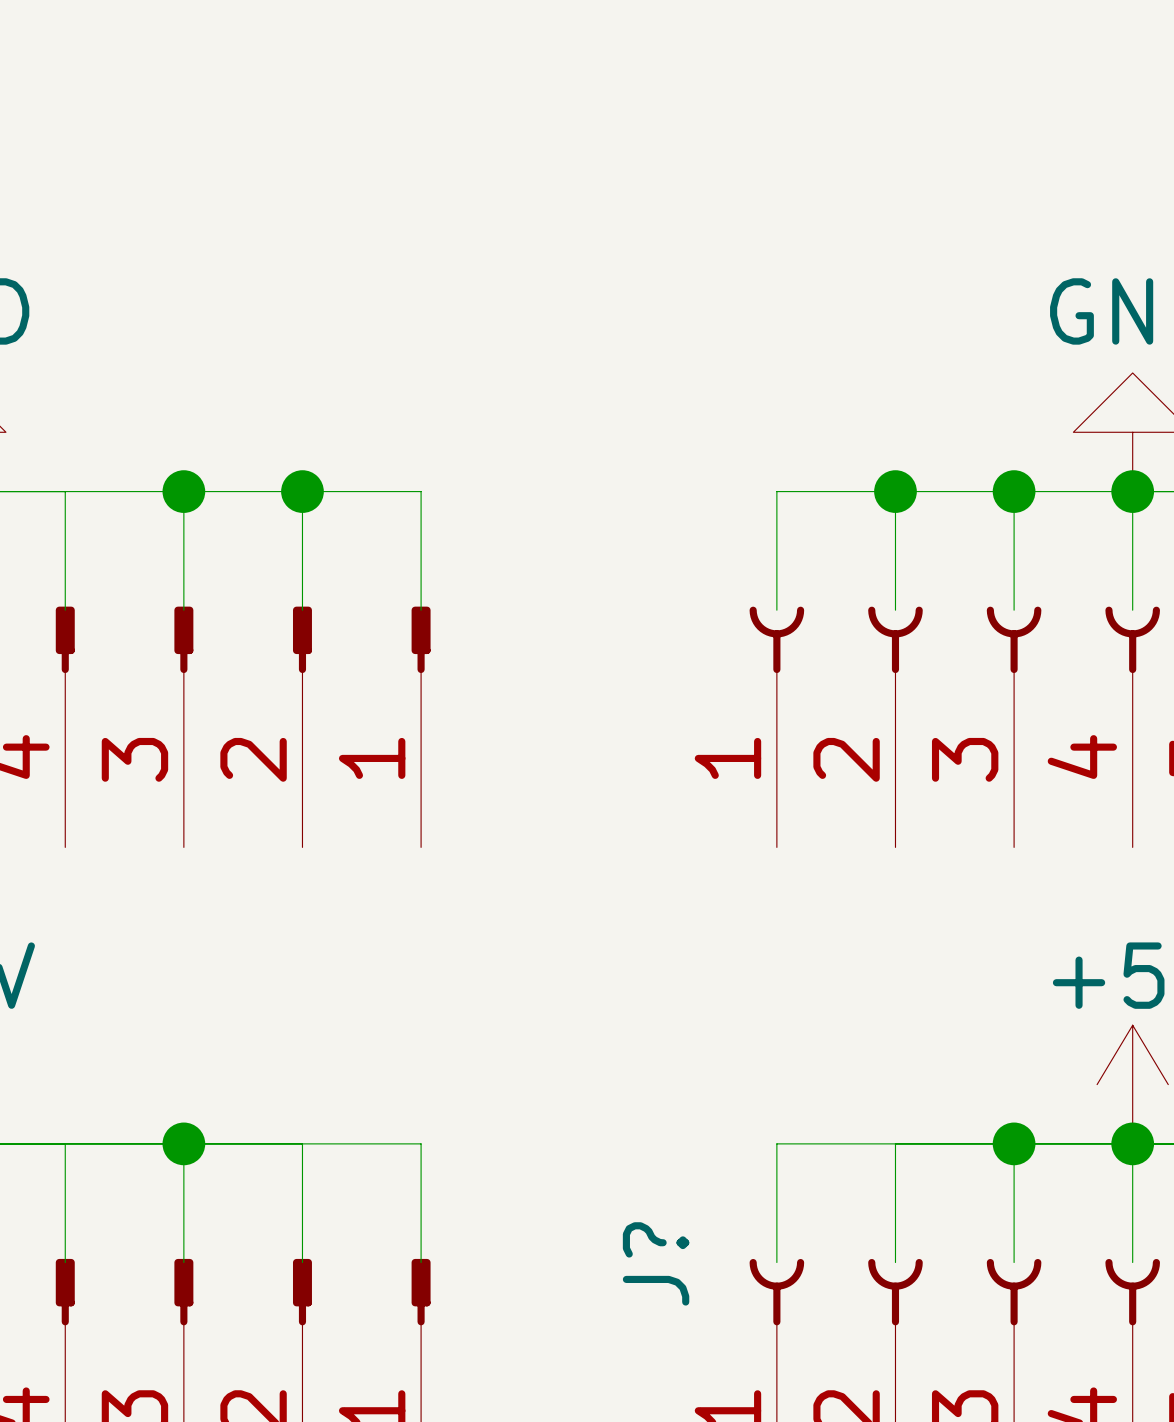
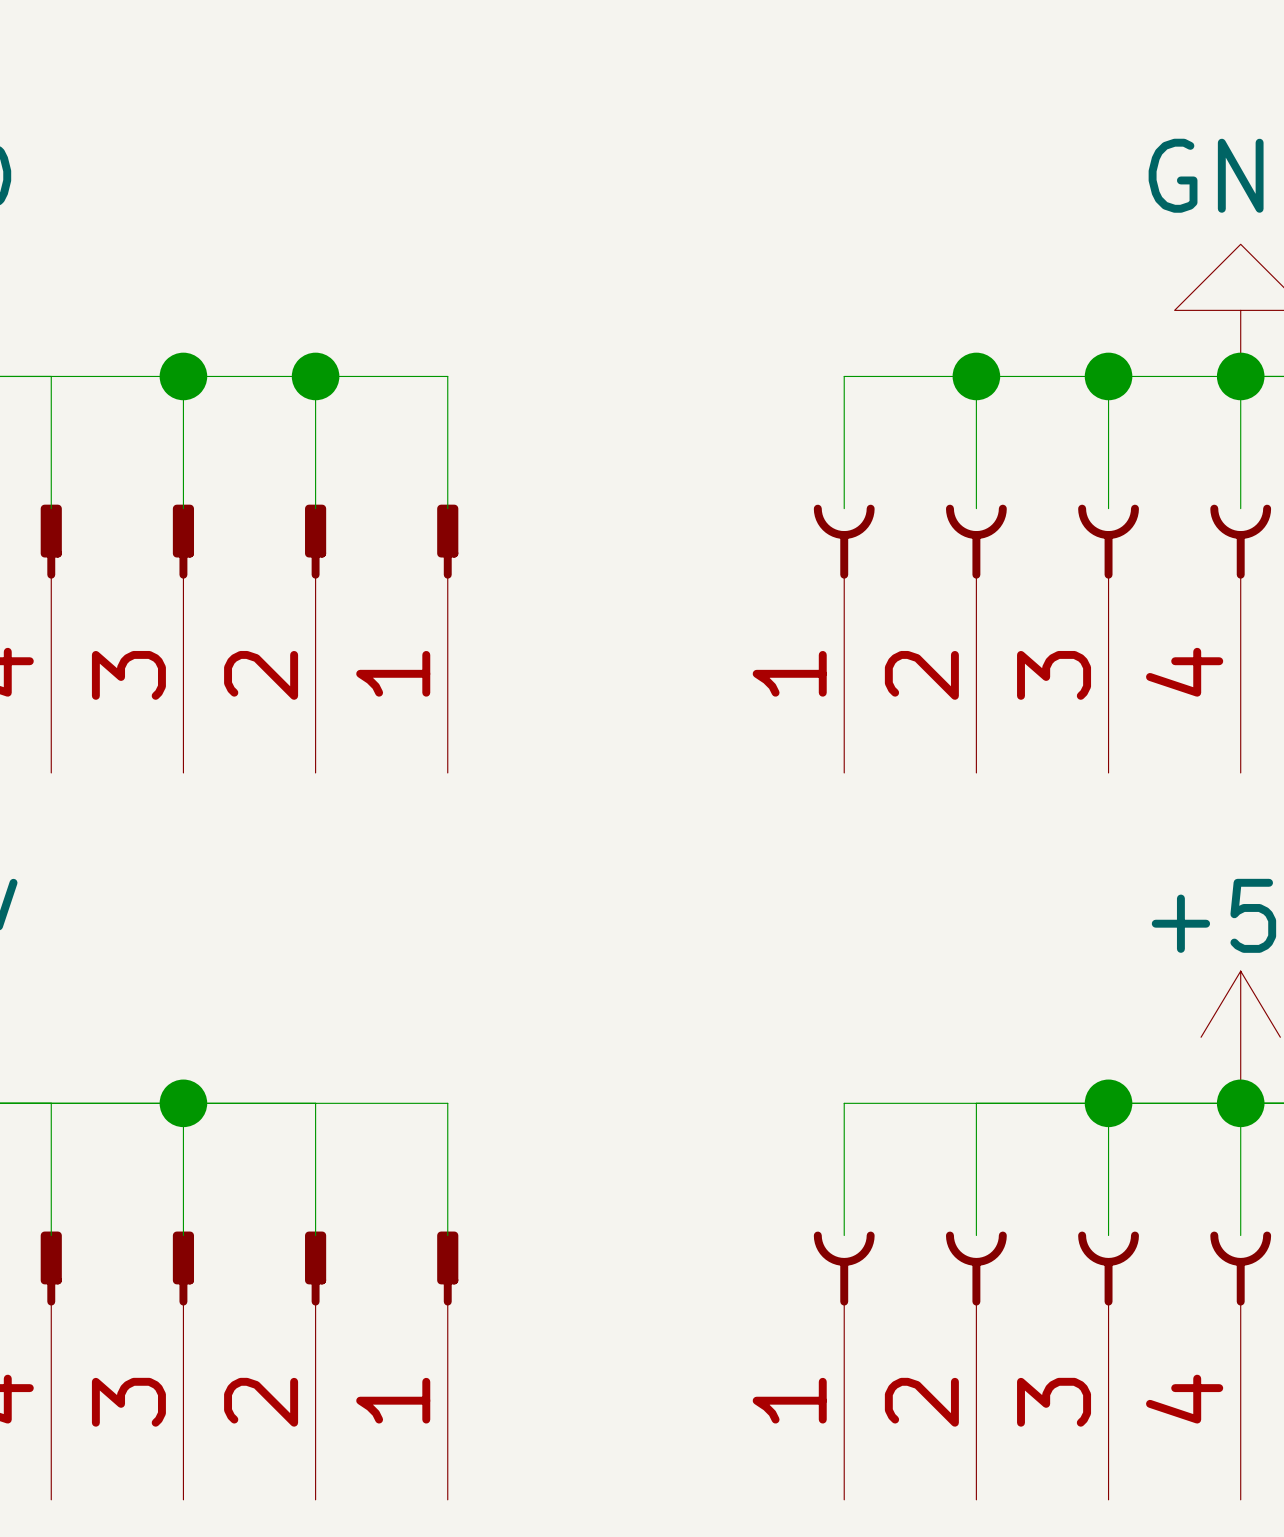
J? name: J? (656, 1263) -> none

